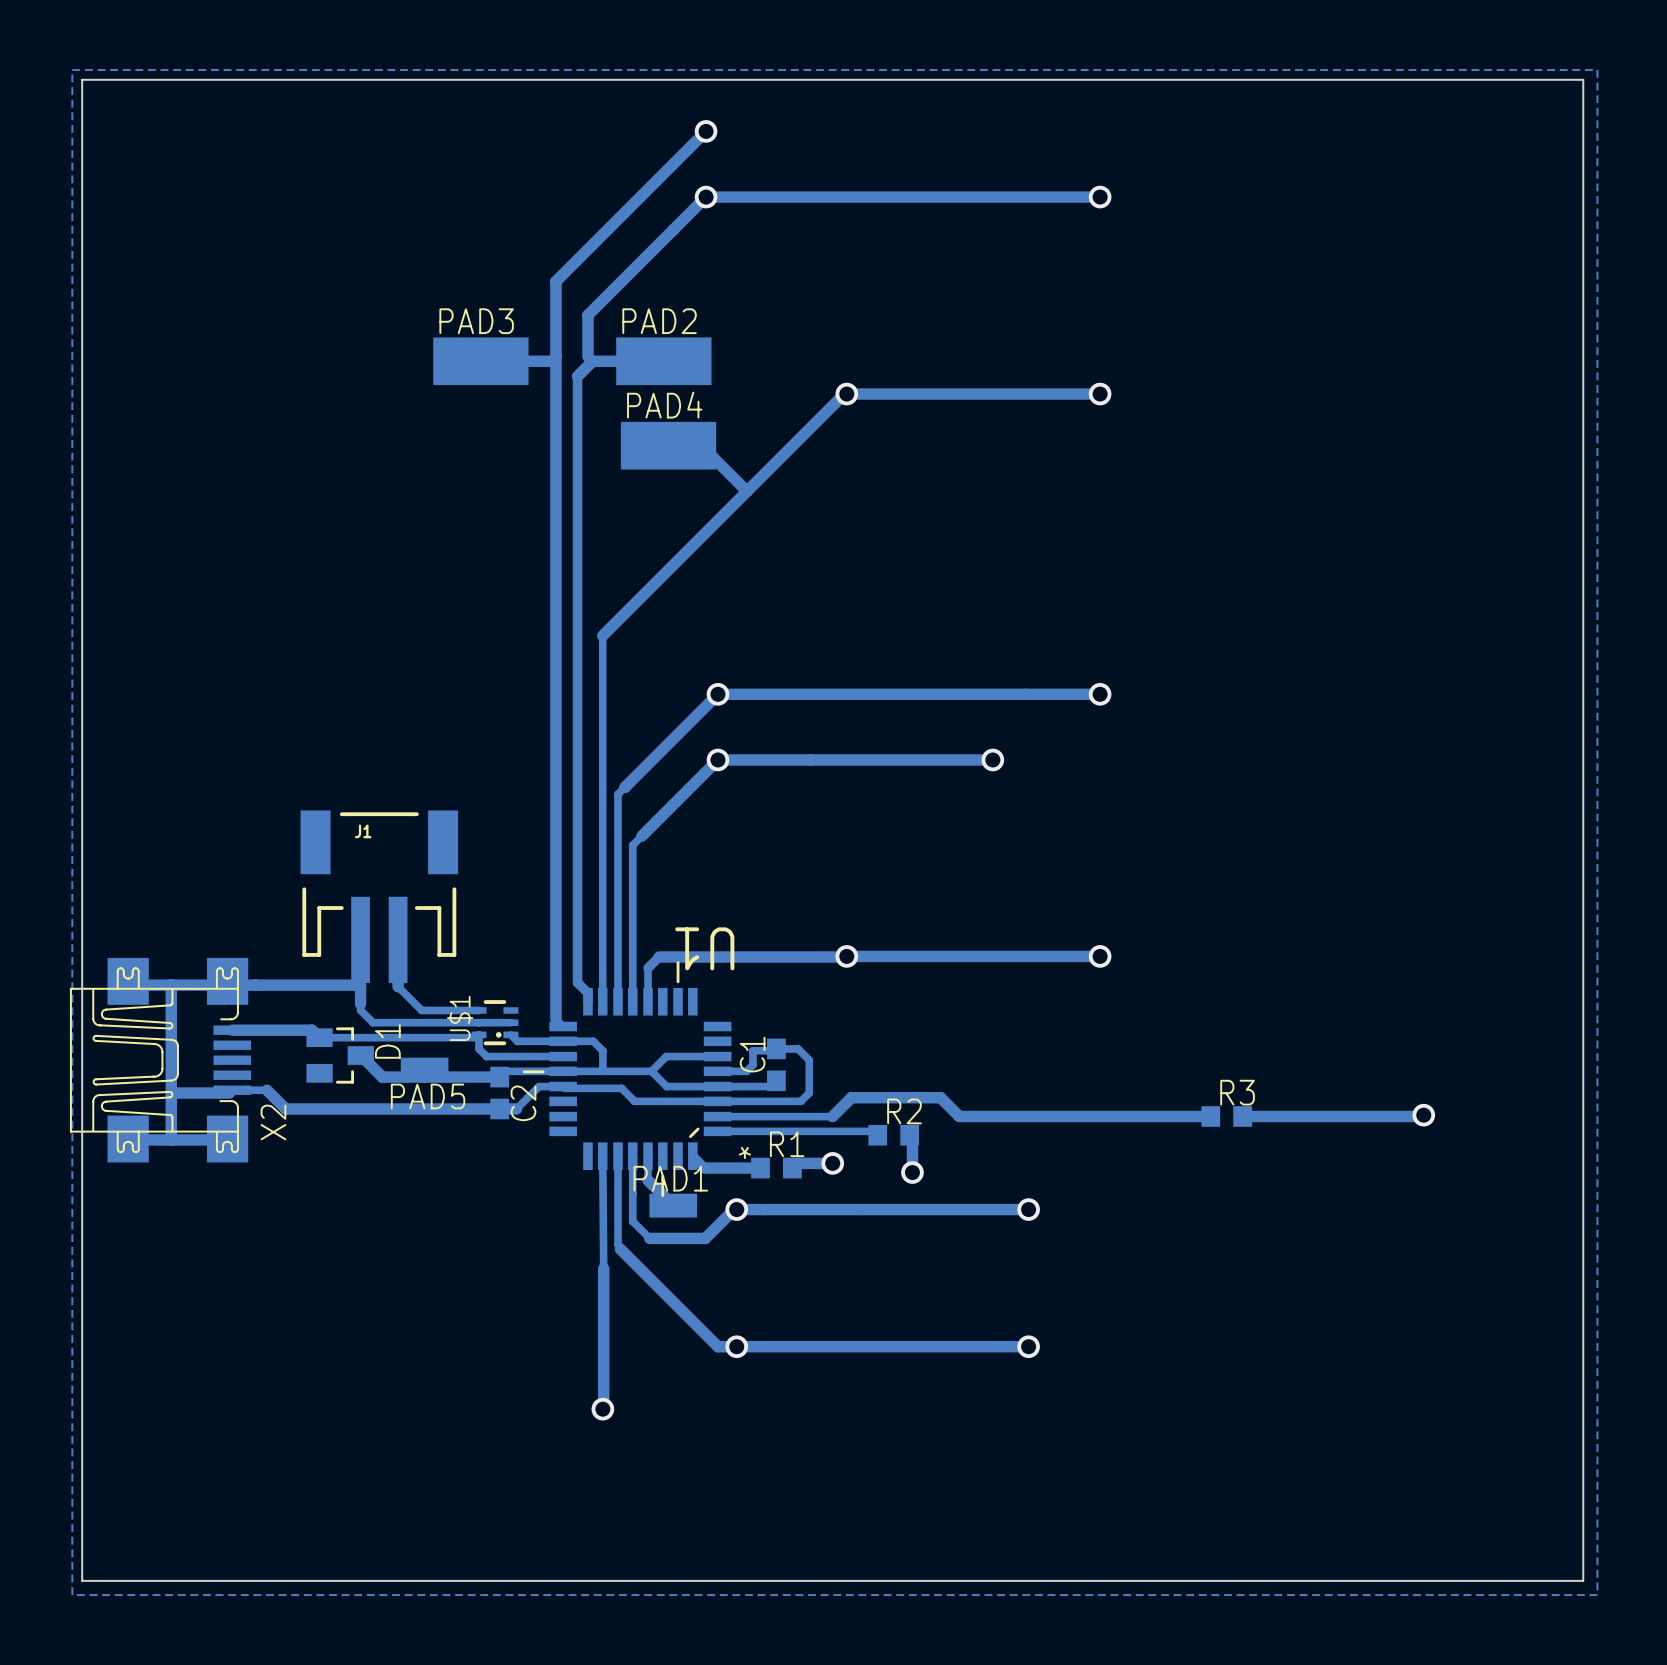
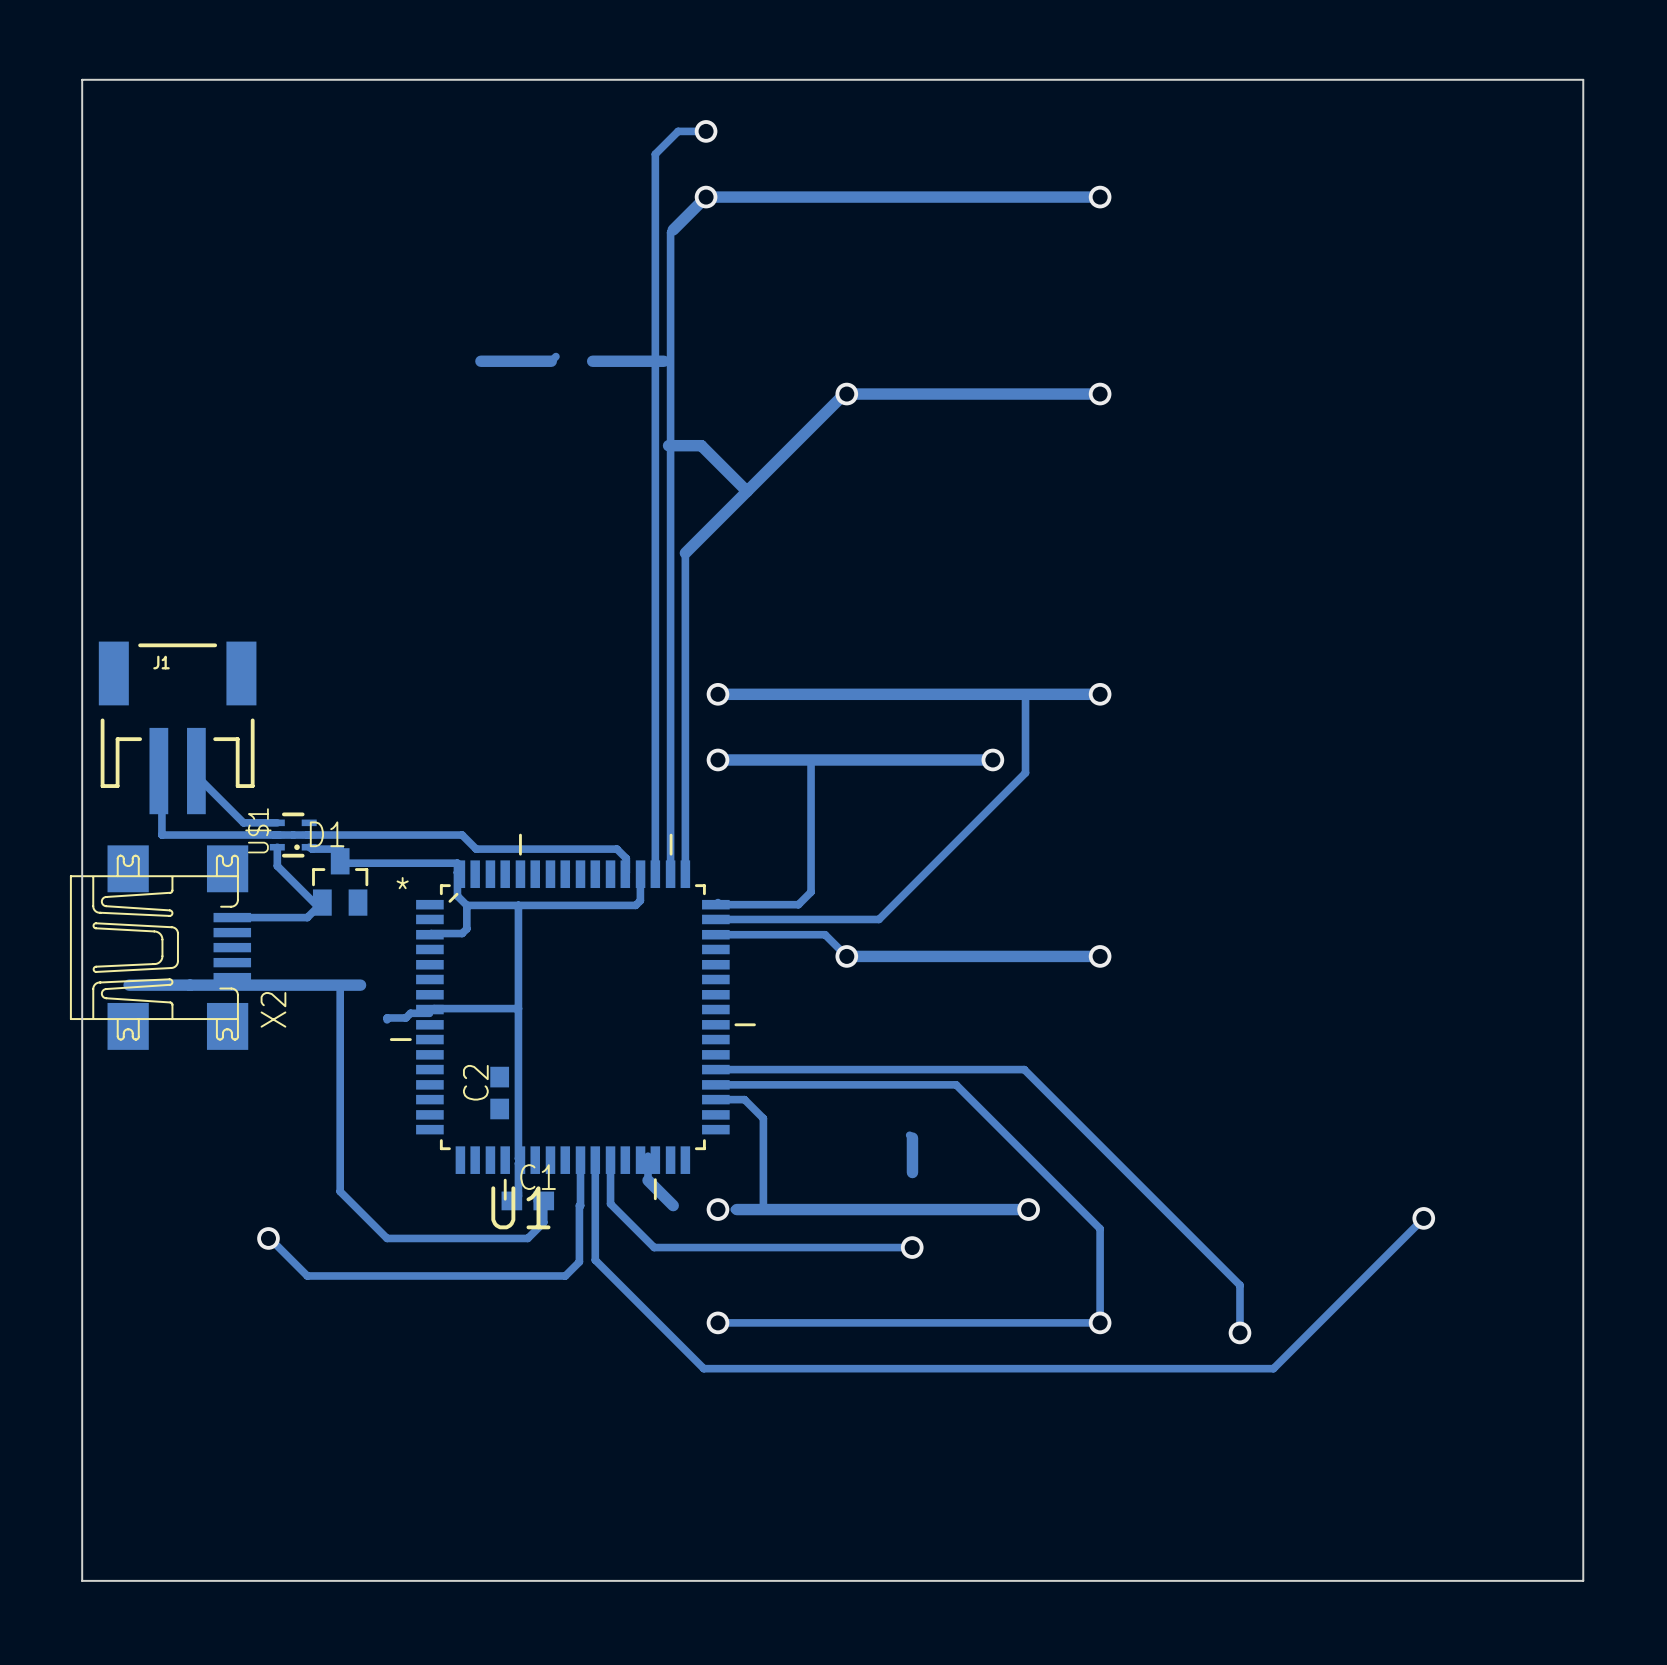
zone outline: (1597, 69) (72, 69) (72, 1595) (1597, 1595) (1597, 69) -> none
track: (706, 131) (555, 281) (555, 1019) (563, 1026) -> (706, 131) (678, 131) (655, 154) (655, 874)
track: (673, 229) (587, 315) (587, 356) (592, 361) (577, 376) (577, 982) (587, 993) (587, 1001) -> none
track: none -> (670, 232) (670, 874)
PAD3: (480, 361) -> none
PAD2: (663, 361) -> none
PAD4: (668, 445) -> none
track: (685, 553) (602, 635) (602, 1001) -> (685, 553) (685, 874)
track: (717, 694) (625, 787) -> none
track: none -> (1025, 694) (1025, 772) (878, 919) (715, 919)
track: (717, 759) (632, 845) (632, 1001) -> none
track: none -> (811, 759) (811, 892) (798, 904) (715, 904) (717, 902)
track: none -> (158, 771) (161, 774) (161, 835) (462, 835) (476, 849) (616, 849) (626, 858) (625, 874)
track: none -> (196, 771) (196, 775) (243, 822) (277, 822)
track: (625, 787) (617, 794) (617, 1001) -> none
track: none -> (277, 847) (277, 865) (318, 906)
track: none -> (309, 847) (312, 849) (340, 849) (340, 863) (457, 863) (457, 896) (466, 905)
track: none -> (640, 874) (640, 900) (635, 905) (466, 905)
J1 position: (379, 896) -> (177, 727)
track: none -> (322, 902) (307, 917) (232, 917)
track: none -> (466, 905) (466, 928) (462, 933) (429, 934)
track: none -> (518, 905) (518, 1158) (520, 1160) (518, 1163) (518, 1196) (511, 1200)
track: (360, 939) (360, 1010) (373, 1022) (510, 1022) -> none
track: (398, 939) (398, 986) (421, 1010) (479, 1010) -> none
U1 name position: U1 (704, 948) -> U1 (520, 1207)
track: (846, 956) (659, 957) (648, 968) (648, 1001) -> (846, 956) (825, 934) (715, 934)
U1 footprint: [522, 961, 732, 1198] -> [389, 833, 756, 1201]
track: none -> (340, 985) (340, 1191) (387, 1238) (527, 1238) (543, 1222) (543, 1200) (537, 1200)
track: none -> (518, 1008) (433, 1008) (429, 1009) (429, 1013) (410, 1013) (405, 1017) (387, 1017) (387, 1019)
U$1 position: (494, 1022) -> (293, 835)
track: (232, 1030) (312, 1030) (319, 1037) (476, 1037) (479, 1034) (479, 1048) (486, 1056) (563, 1056) -> none
track: (510, 1034) (517, 1041) (593, 1041) (602, 1050) (602, 1071) -> none
D1 rotation: 0° (340, 1055) -> 90° counterclockwise (340, 881)
D1 position: (340, 1055) -> (340, 881)
track: (360, 1055) (382, 1077) (499, 1077) (505, 1071) (651, 1071) -> none
track: (717, 1056) (666, 1056) (651, 1071) -> none
X2 position: (160, 1060) -> (160, 947)
C1 rotation: 0° (776, 1064) -> 90° clockwise (527, 1200)
C1 position: (776, 1064) -> (527, 1200)
PAD5: (424, 1069) -> none
track: none -> (715, 1069) (1024, 1069) (1239, 1285) (1239, 1332)
track: (651, 1071) (666, 1086) (775, 1086) (776, 1080) -> none
track: (717, 1071) (746, 1071) (752, 1064) (752, 1050) (798, 1048) (809, 1060) (809, 1093) (800, 1101) (634, 1101) (621, 1088) (538, 1086) (516, 1108) (285, 1108) (267, 1090) (232, 1090) (229, 1093) (171, 1093) (171, 985) (171, 1139) -> none
track: none -> (715, 1084) (956, 1084) (1100, 1228) (1100, 1322) (717, 1322)
track: none -> (715, 1099) (744, 1099) (763, 1118) (763, 1209)
C2 name position: C2 (523, 1103) -> C2 (475, 1082)
track: (1423, 1115) (1242, 1116) -> none
via position: (1423, 1115) -> (1423, 1218)
track: (1210, 1116) (959, 1116) (940, 1097) (851, 1097) (832, 1116) (717, 1116) -> none
R3: (1226, 1116) -> none
track: (717, 1131) (873, 1131) (877, 1135) -> none
R2: (893, 1135) -> none
track: (227, 1139) (124, 1139) -> none
track: (602, 1156) (602, 1409) -> none
track: (617, 1156) (618, 1244) (717, 1346) (1028, 1346) -> none
track: (632, 1156) (632, 1221) (649, 1238) (705, 1238) (734, 1209) (736, 1209) -> none
track: (692, 1156) (704, 1168) (760, 1168) -> none
track: none -> (580, 1160) (580, 1206)
track: none -> (595, 1160) (595, 1260) (703, 1368) (1273, 1368) (1423, 1218)
track: none -> (610, 1160) (610, 1203) (654, 1247) (912, 1247)
track: (832, 1163) (797, 1163) (792, 1168) -> none
via: (832, 1163) -> none
R1: (776, 1168) -> none
via: (912, 1172) -> none
track: none -> (580, 1205) (579, 1261) (565, 1275) (307, 1275) (268, 1238)
PAD1: (673, 1205) -> none
via position: (736, 1209) -> (717, 1209)
via: none -> (268, 1238)
via: none -> (912, 1247)
via: none -> (1239, 1332)
via position: (736, 1346) -> (717, 1322)
via position: (1028, 1346) -> (1100, 1322)
via: (602, 1409) -> none

